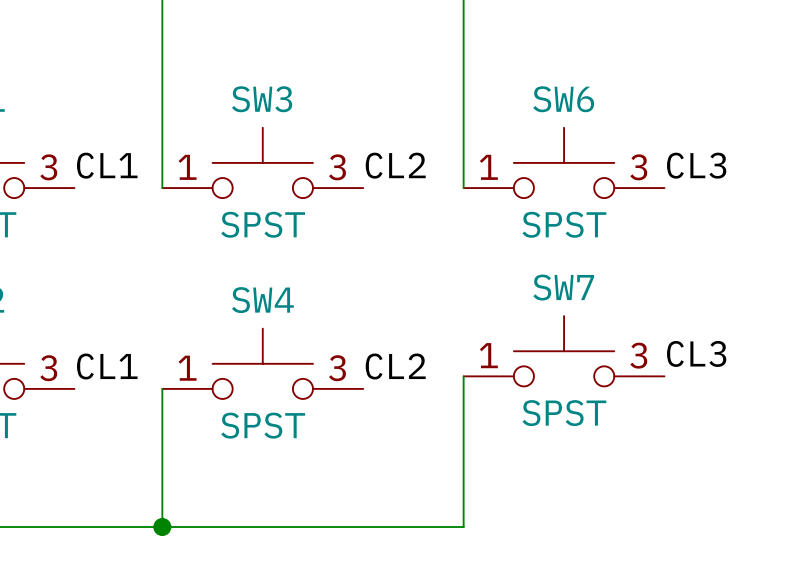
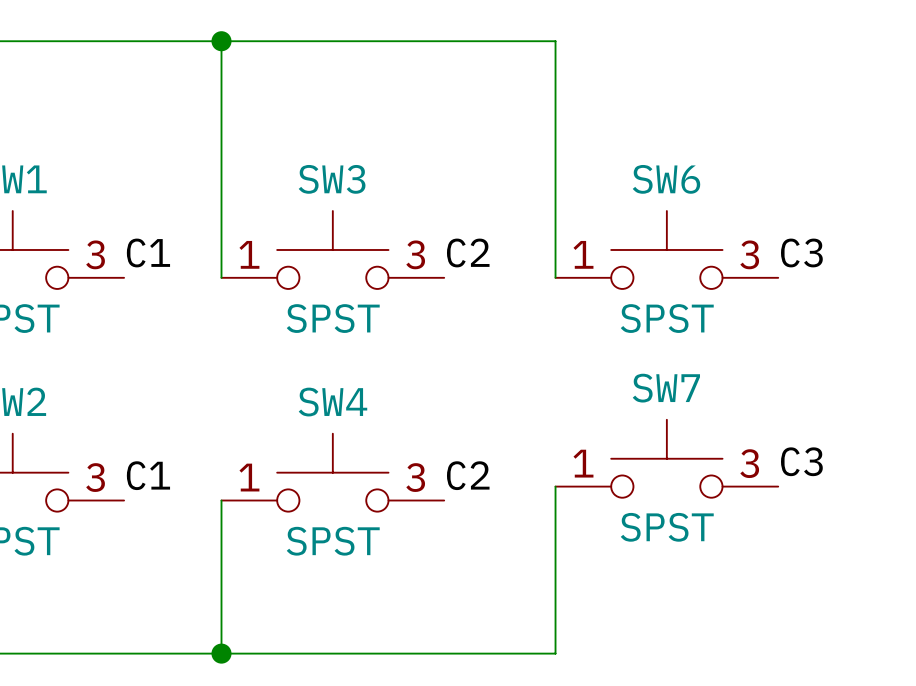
label: CL1 (107, 165) -> C1 (148, 252)
label: CL2 (395, 165) -> C2 (468, 252)
label: CL3 (696, 165) -> C3 (801, 252)
label: CL3 (696, 353) -> C3 (801, 461)
label: CL1 (107, 366) -> C1 (148, 475)
label: CL2 (395, 366) -> C2 (468, 475)

